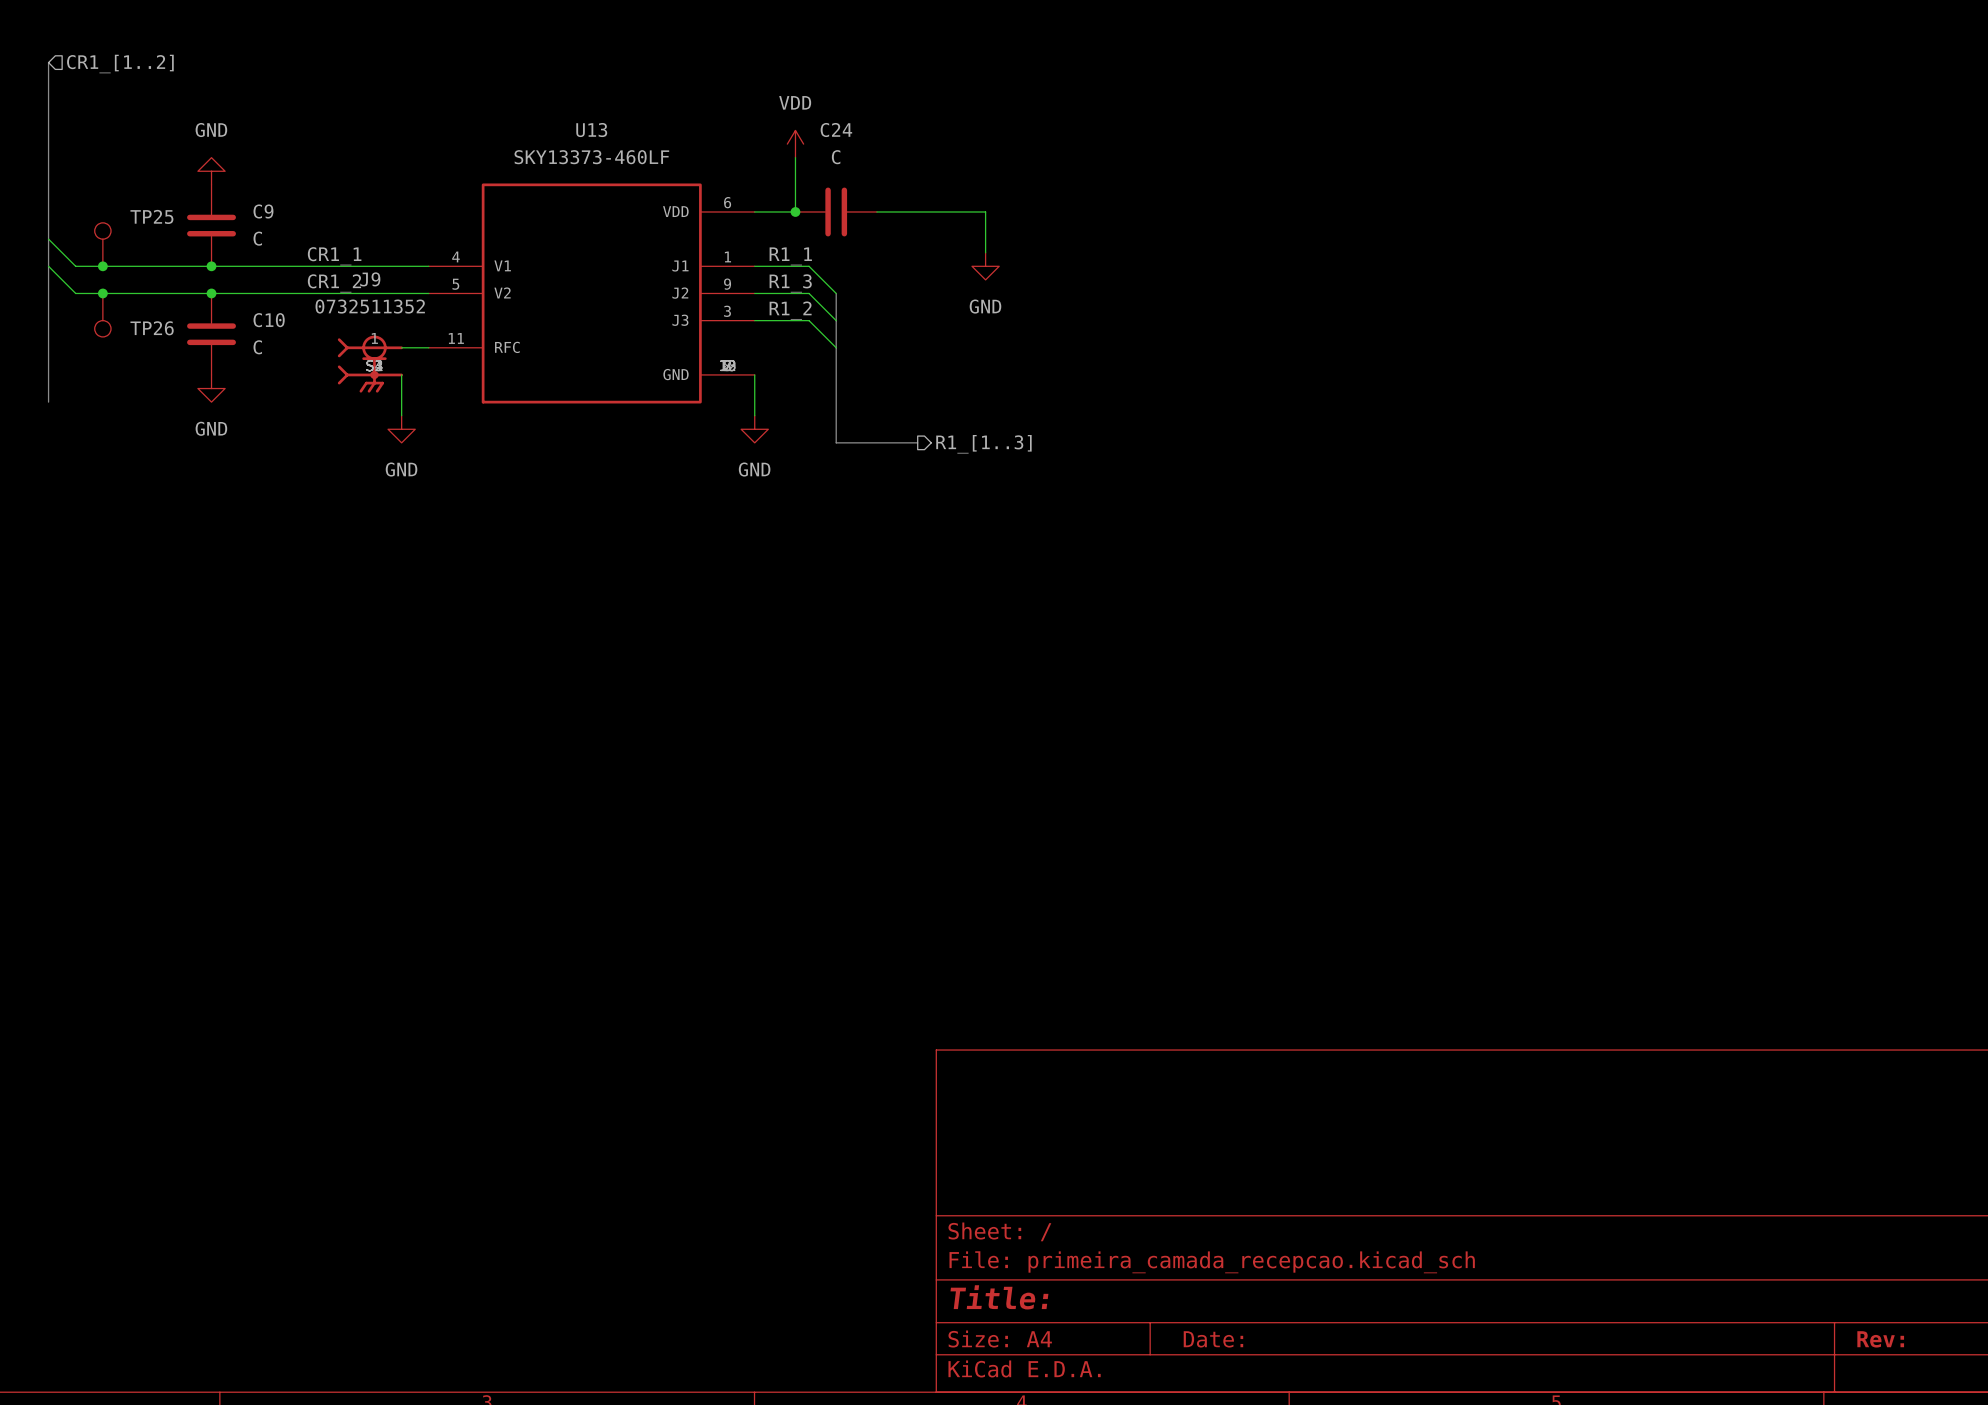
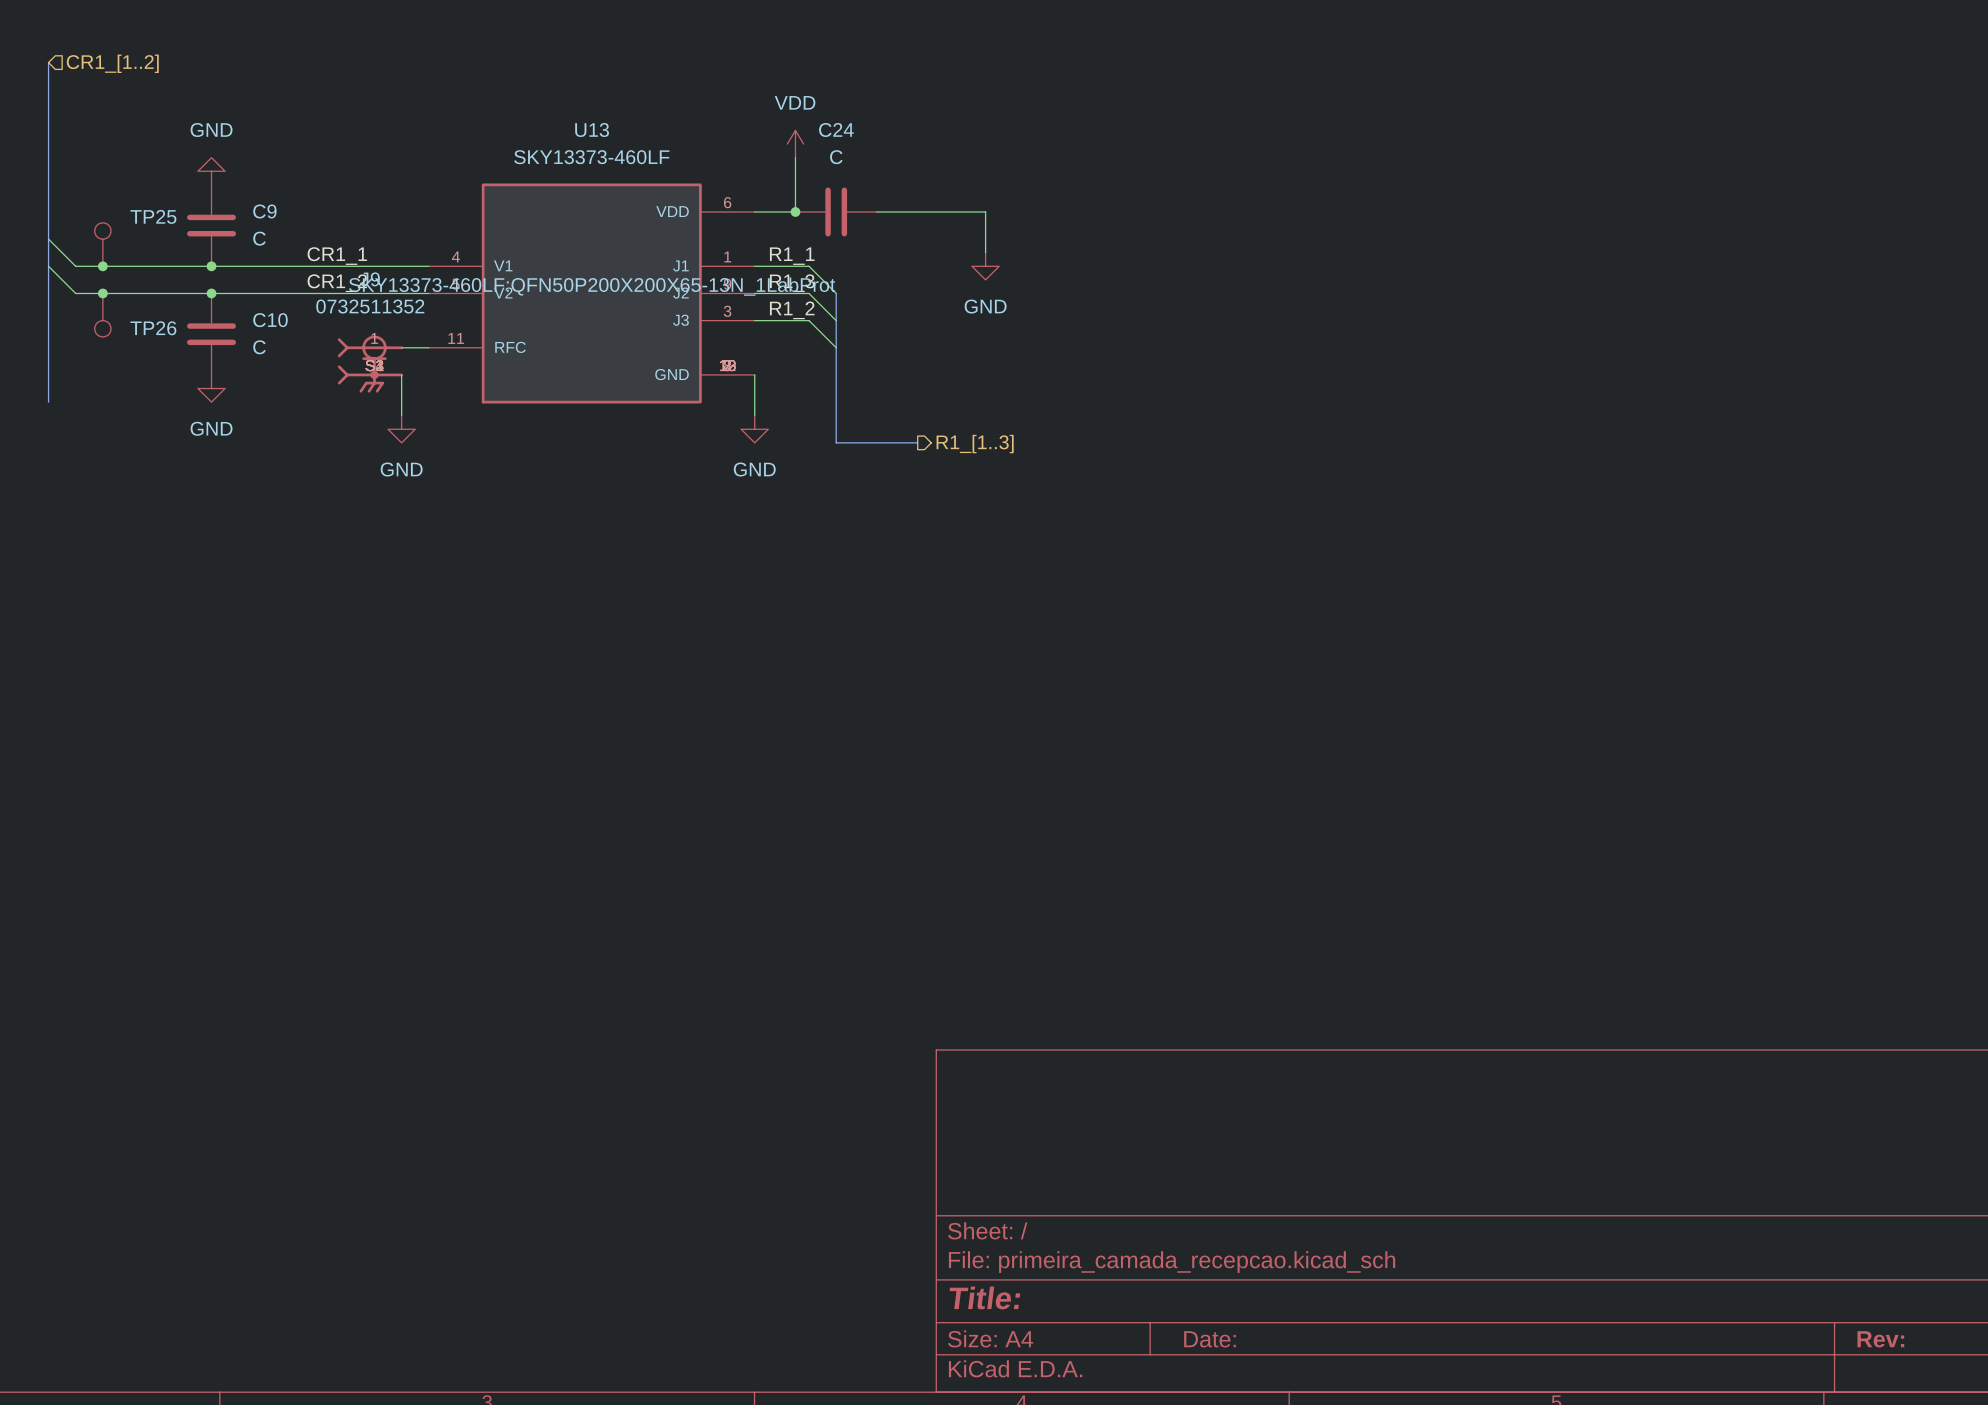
U13 text: none -> SKY13373-460LF:QFN50P200X200X65-13N_1LabProt (592, 286)

